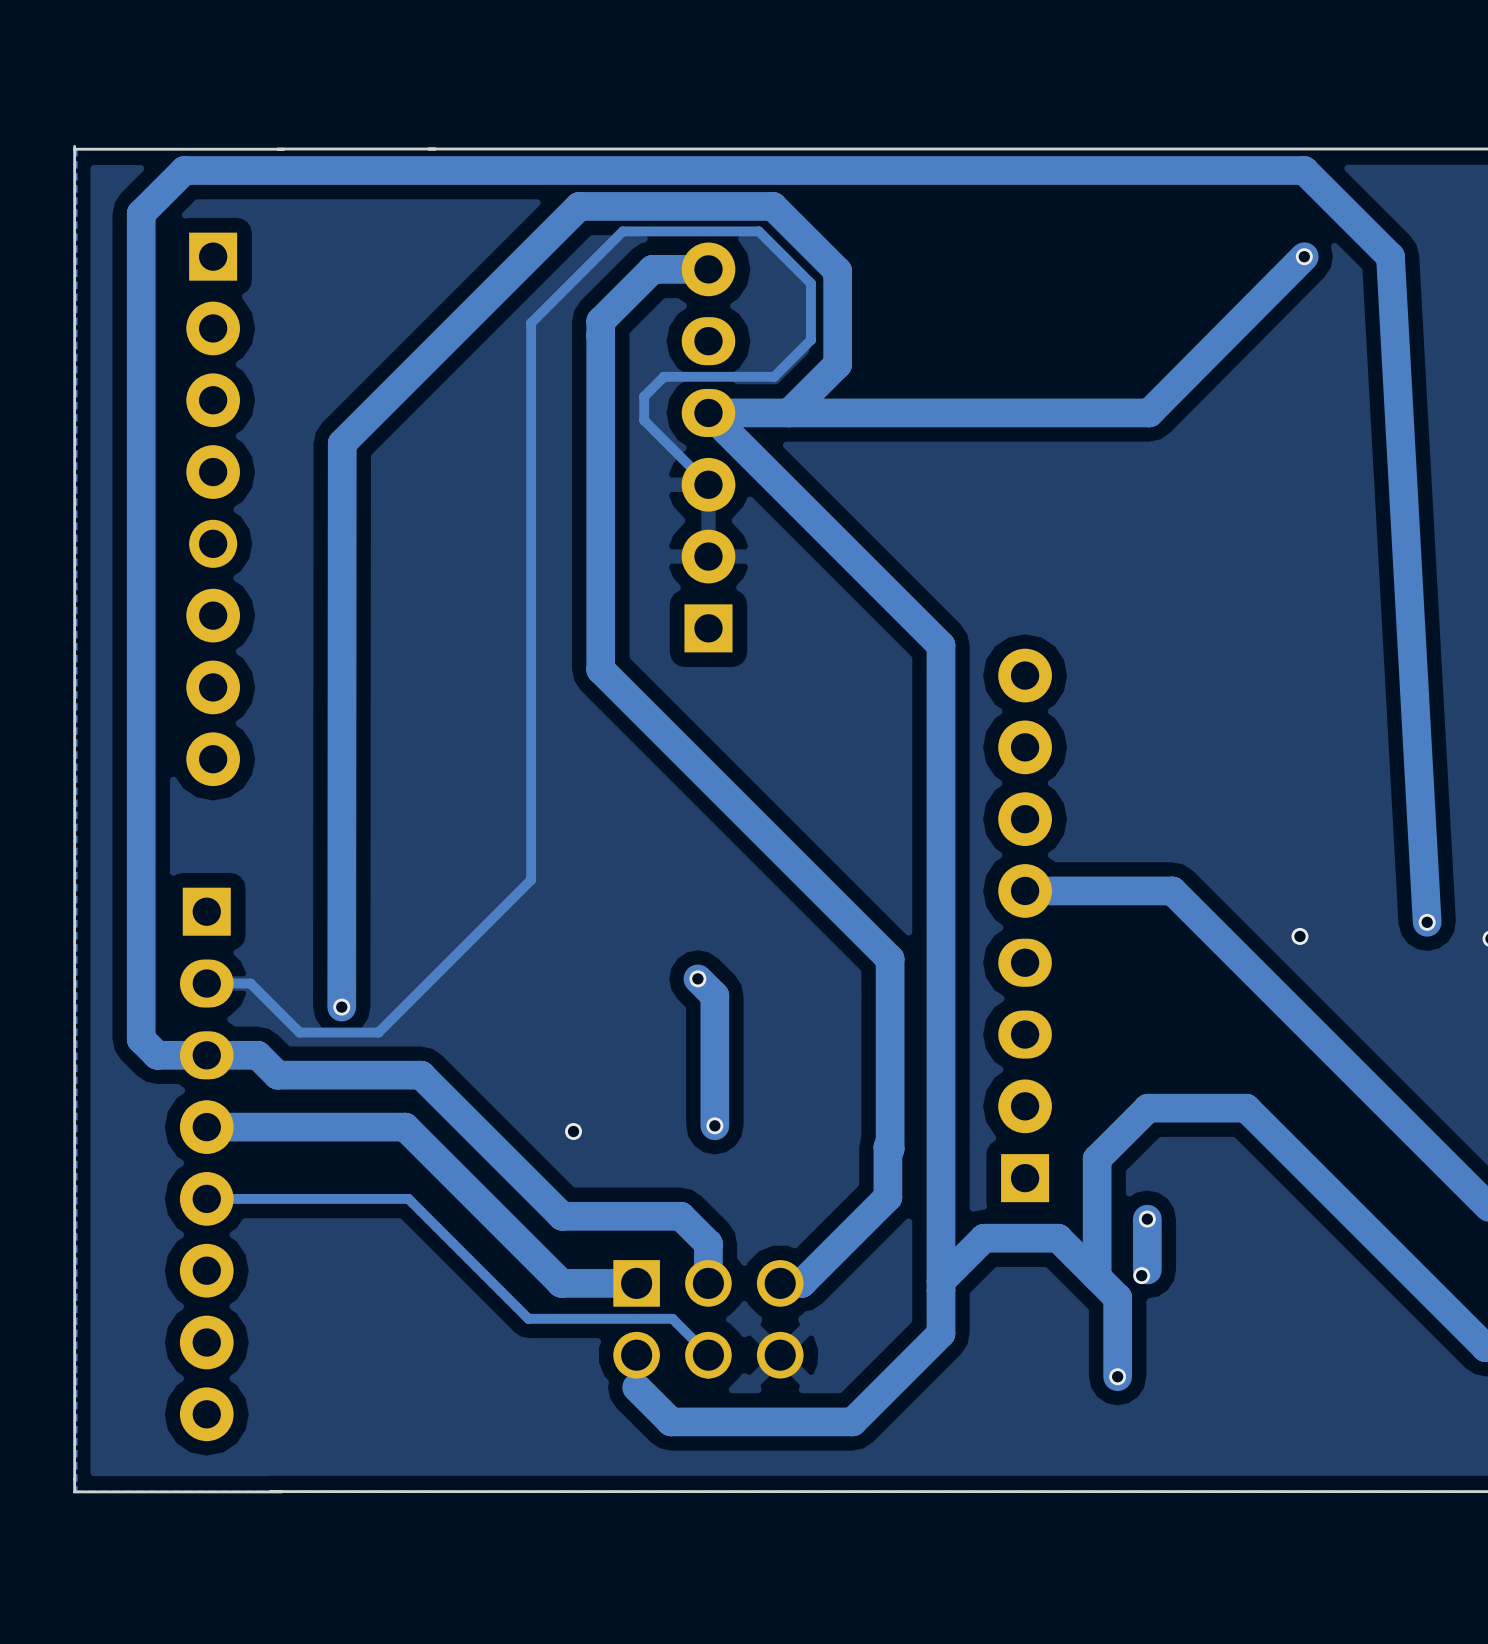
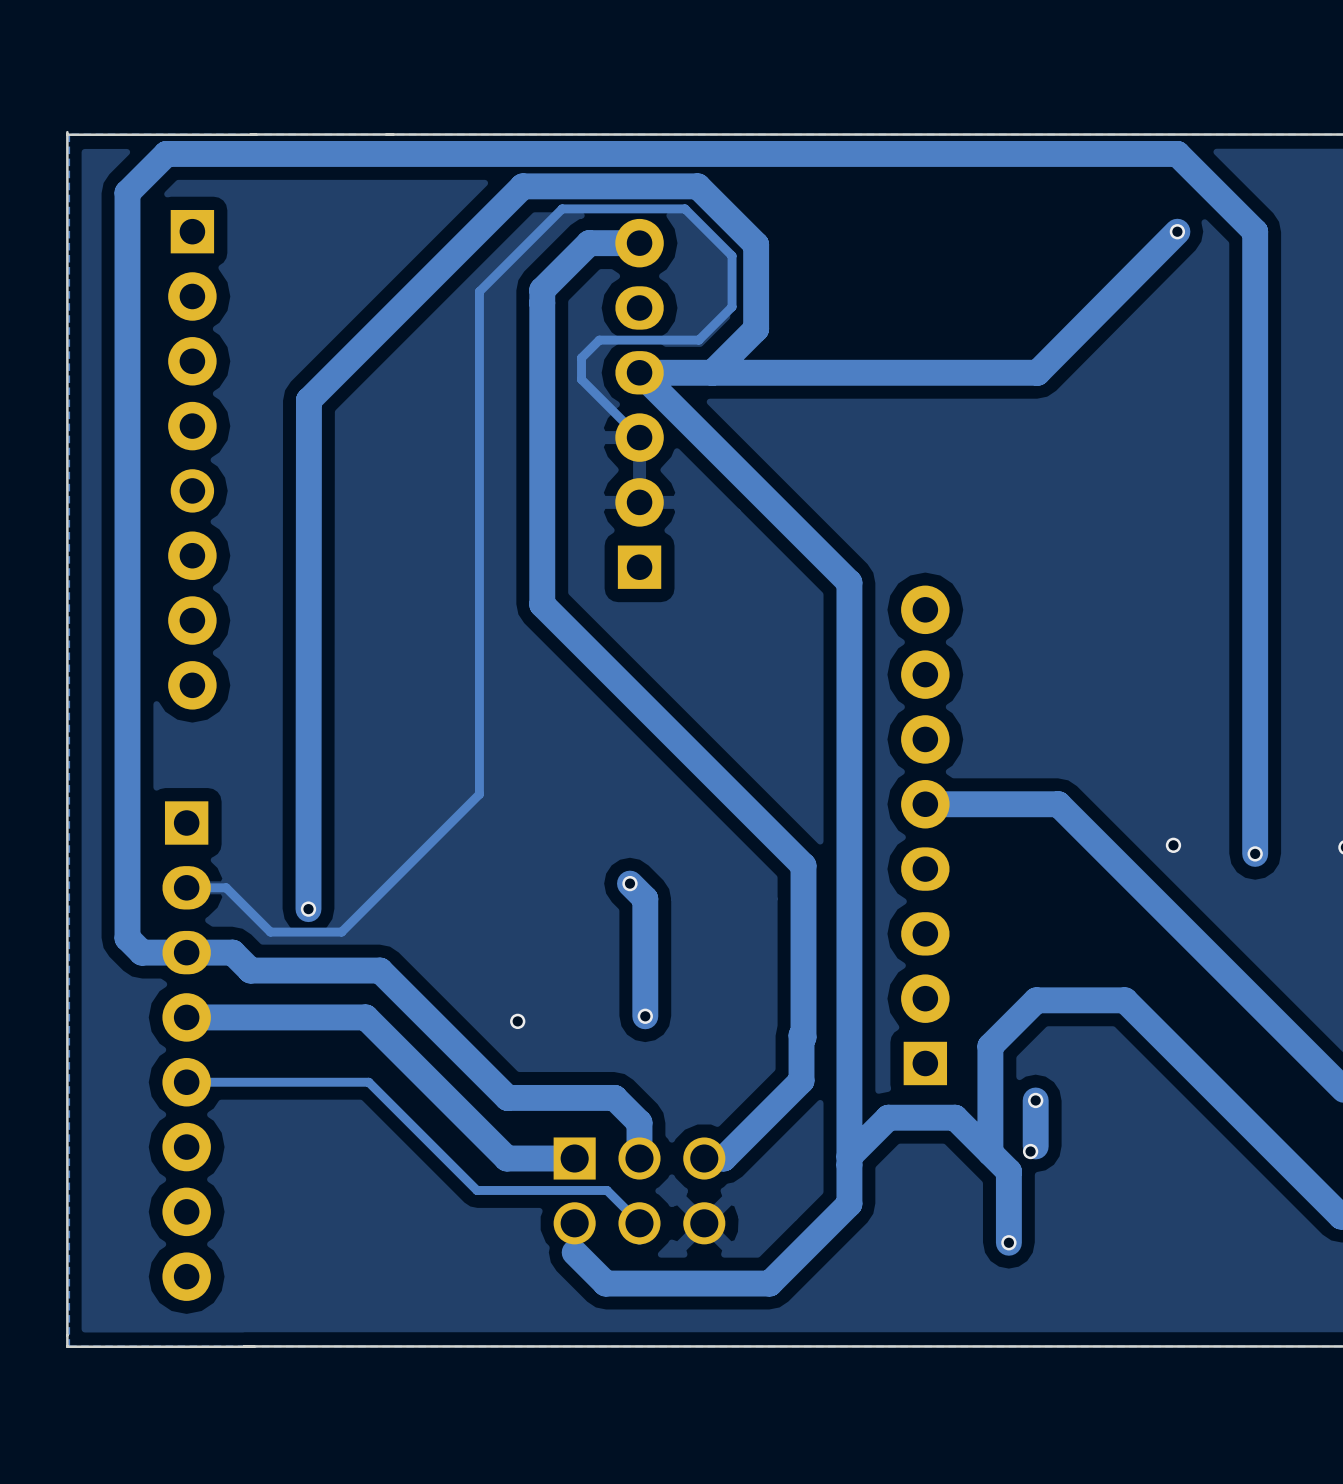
track: (1390, 256) (1427, 922) -> (1255, 231) (1255, 853)
via position: (1427, 922) -> (1255, 853)

